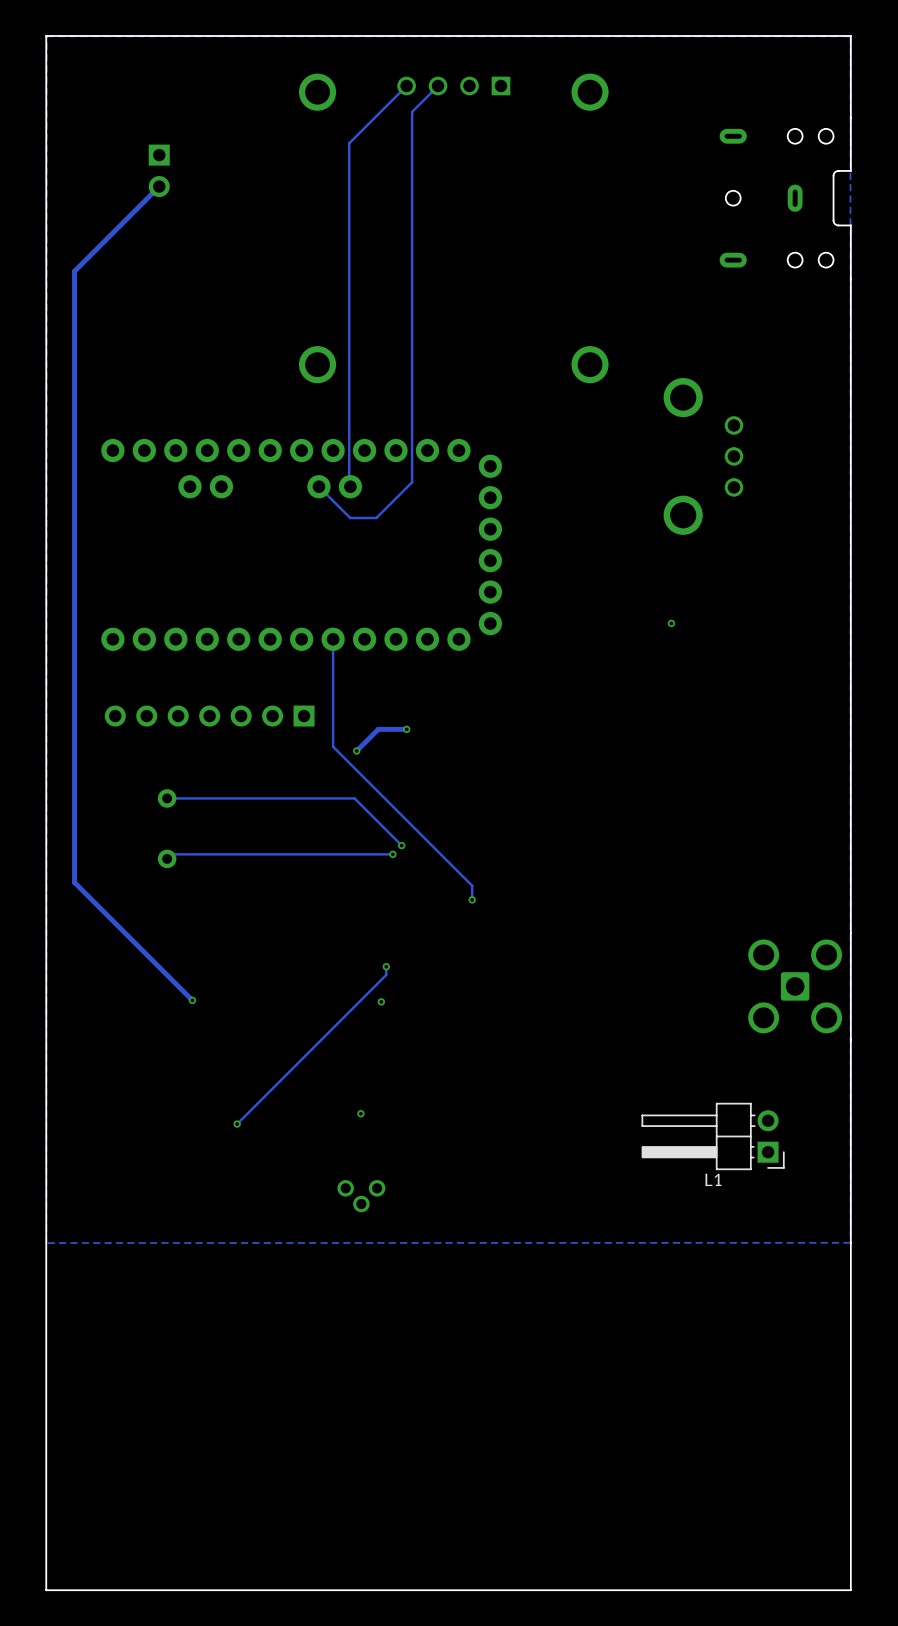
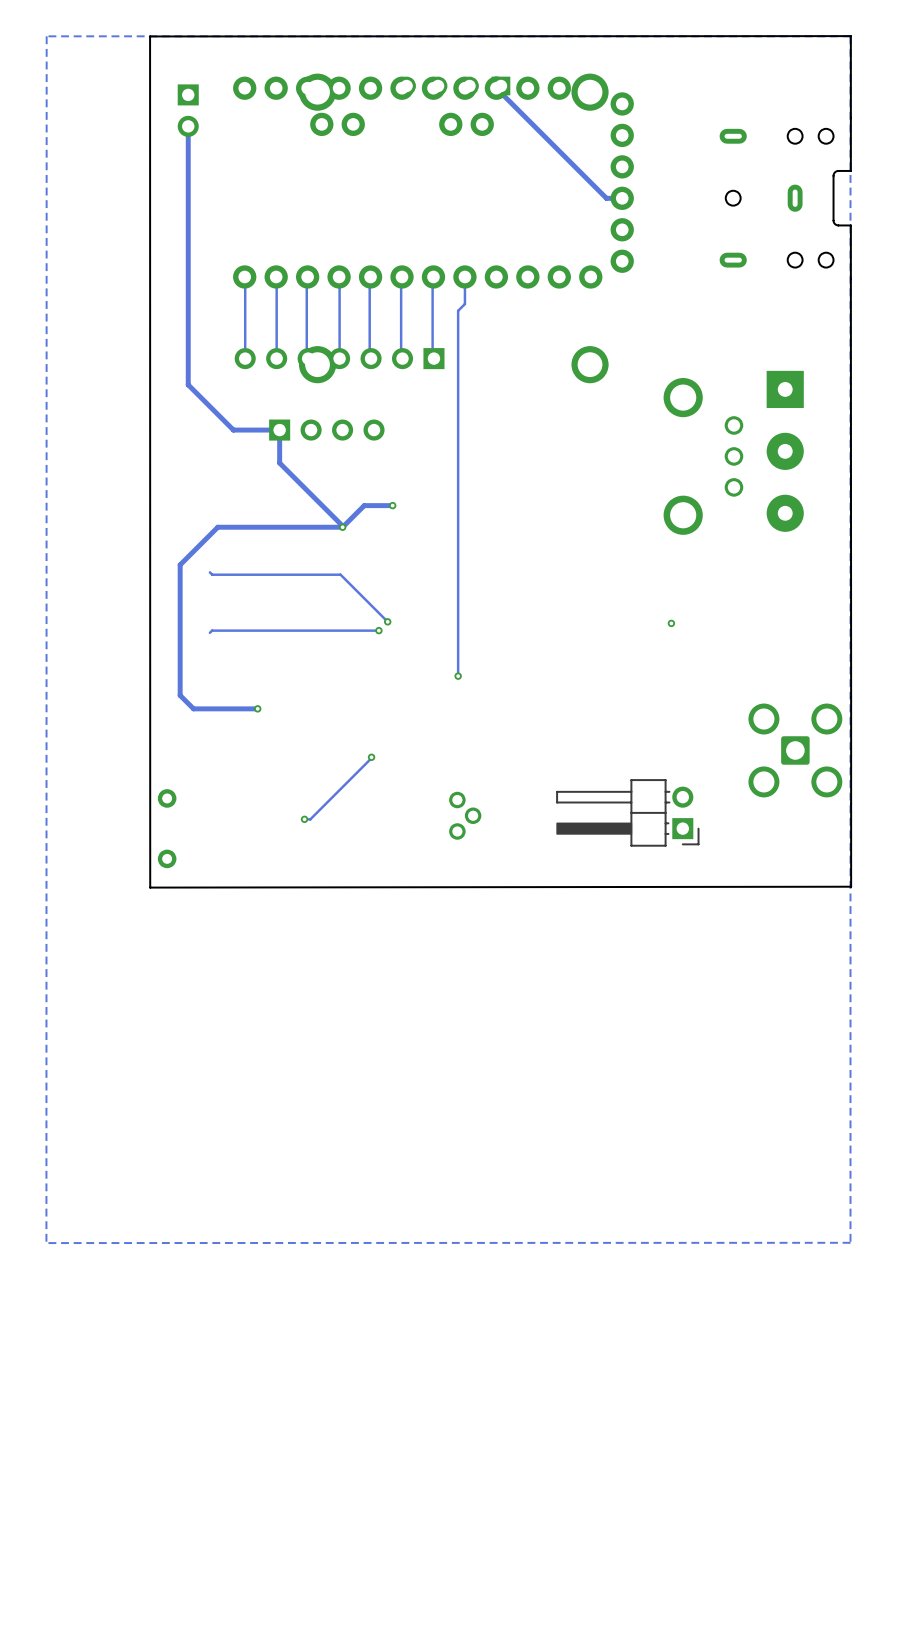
board edge: (850, 35) (46, 35) (46, 1590) (850, 1590) (850, 1039) -> (850, 36) (150, 36) (150, 887) (851, 886) (851, 803)
track: (406, 85) (349, 143) (350, 486) -> none
track: (438, 85) (412, 111) (412, 482) (376, 518) (350, 518) (318, 486) -> none
track: none -> (496, 88) (606, 198) (622, 198)
track: none -> (188, 126) (188, 384) (233, 430) (279, 430) (279, 463) (342, 527)
part position: (159, 170) -> (188, 110)
part: none -> (433, 182)
track: (159, 186) (74, 271) (74, 882) (192, 1000) -> none
track: none -> (306, 276) (308, 358)
track: none -> (369, 276) (371, 358)
track: none -> (401, 276) (402, 358)
track: none -> (432, 276) (433, 358)
track: none -> (464, 276) (464, 304) (458, 310) (458, 676)
track: none -> (245, 278) (245, 358)
track: none -> (276, 278) (276, 358)
track: none -> (339, 278) (339, 358)
board edge: (850, 278) (850, 933) -> (850, 278) (851, 697)
part: none -> (339, 358)
part: none -> (326, 430)
part: none -> (785, 451)
via: none -> (392, 505)
track: none -> (342, 527) (217, 527) (180, 564) (180, 695) (193, 708) (257, 708)
via: none -> (342, 527)
part: (301, 544) -> none
track: none -> (209, 572) (212, 574) (340, 574) (387, 621)
via: none -> (387, 621)
track: none -> (378, 630) (212, 630) (209, 632)
via: none -> (378, 630)
track: (333, 639) (333, 746) (472, 885) (472, 899) -> none
via: none -> (458, 676)
via: none -> (257, 708)
part: (209, 716) -> none
track: (406, 729) (378, 729) (356, 750) -> (392, 505) (364, 505) (342, 527)
via: (406, 729) -> none
via position: (356, 750) -> (371, 757)
track: none -> (371, 757) (310, 819) (304, 819)
track: (167, 798) (354, 798) (401, 845) -> none
part: none -> (627, 812)
part: none -> (465, 815)
via: none -> (304, 819)
via: (401, 845) -> none
track: (392, 854) (171, 854) (167, 858) -> none
via: (392, 854) -> none
via: (472, 899) -> none
track: (386, 966) (386, 974) (237, 1124) -> none
via: (386, 966) -> none
part position: (799, 986) -> (800, 750)
via: (192, 1000) -> none
via: (381, 1001) -> none
via: (360, 1113) -> none
via: (237, 1124) -> none
L1: (713, 1136) -> none
part: (361, 1196) -> none

